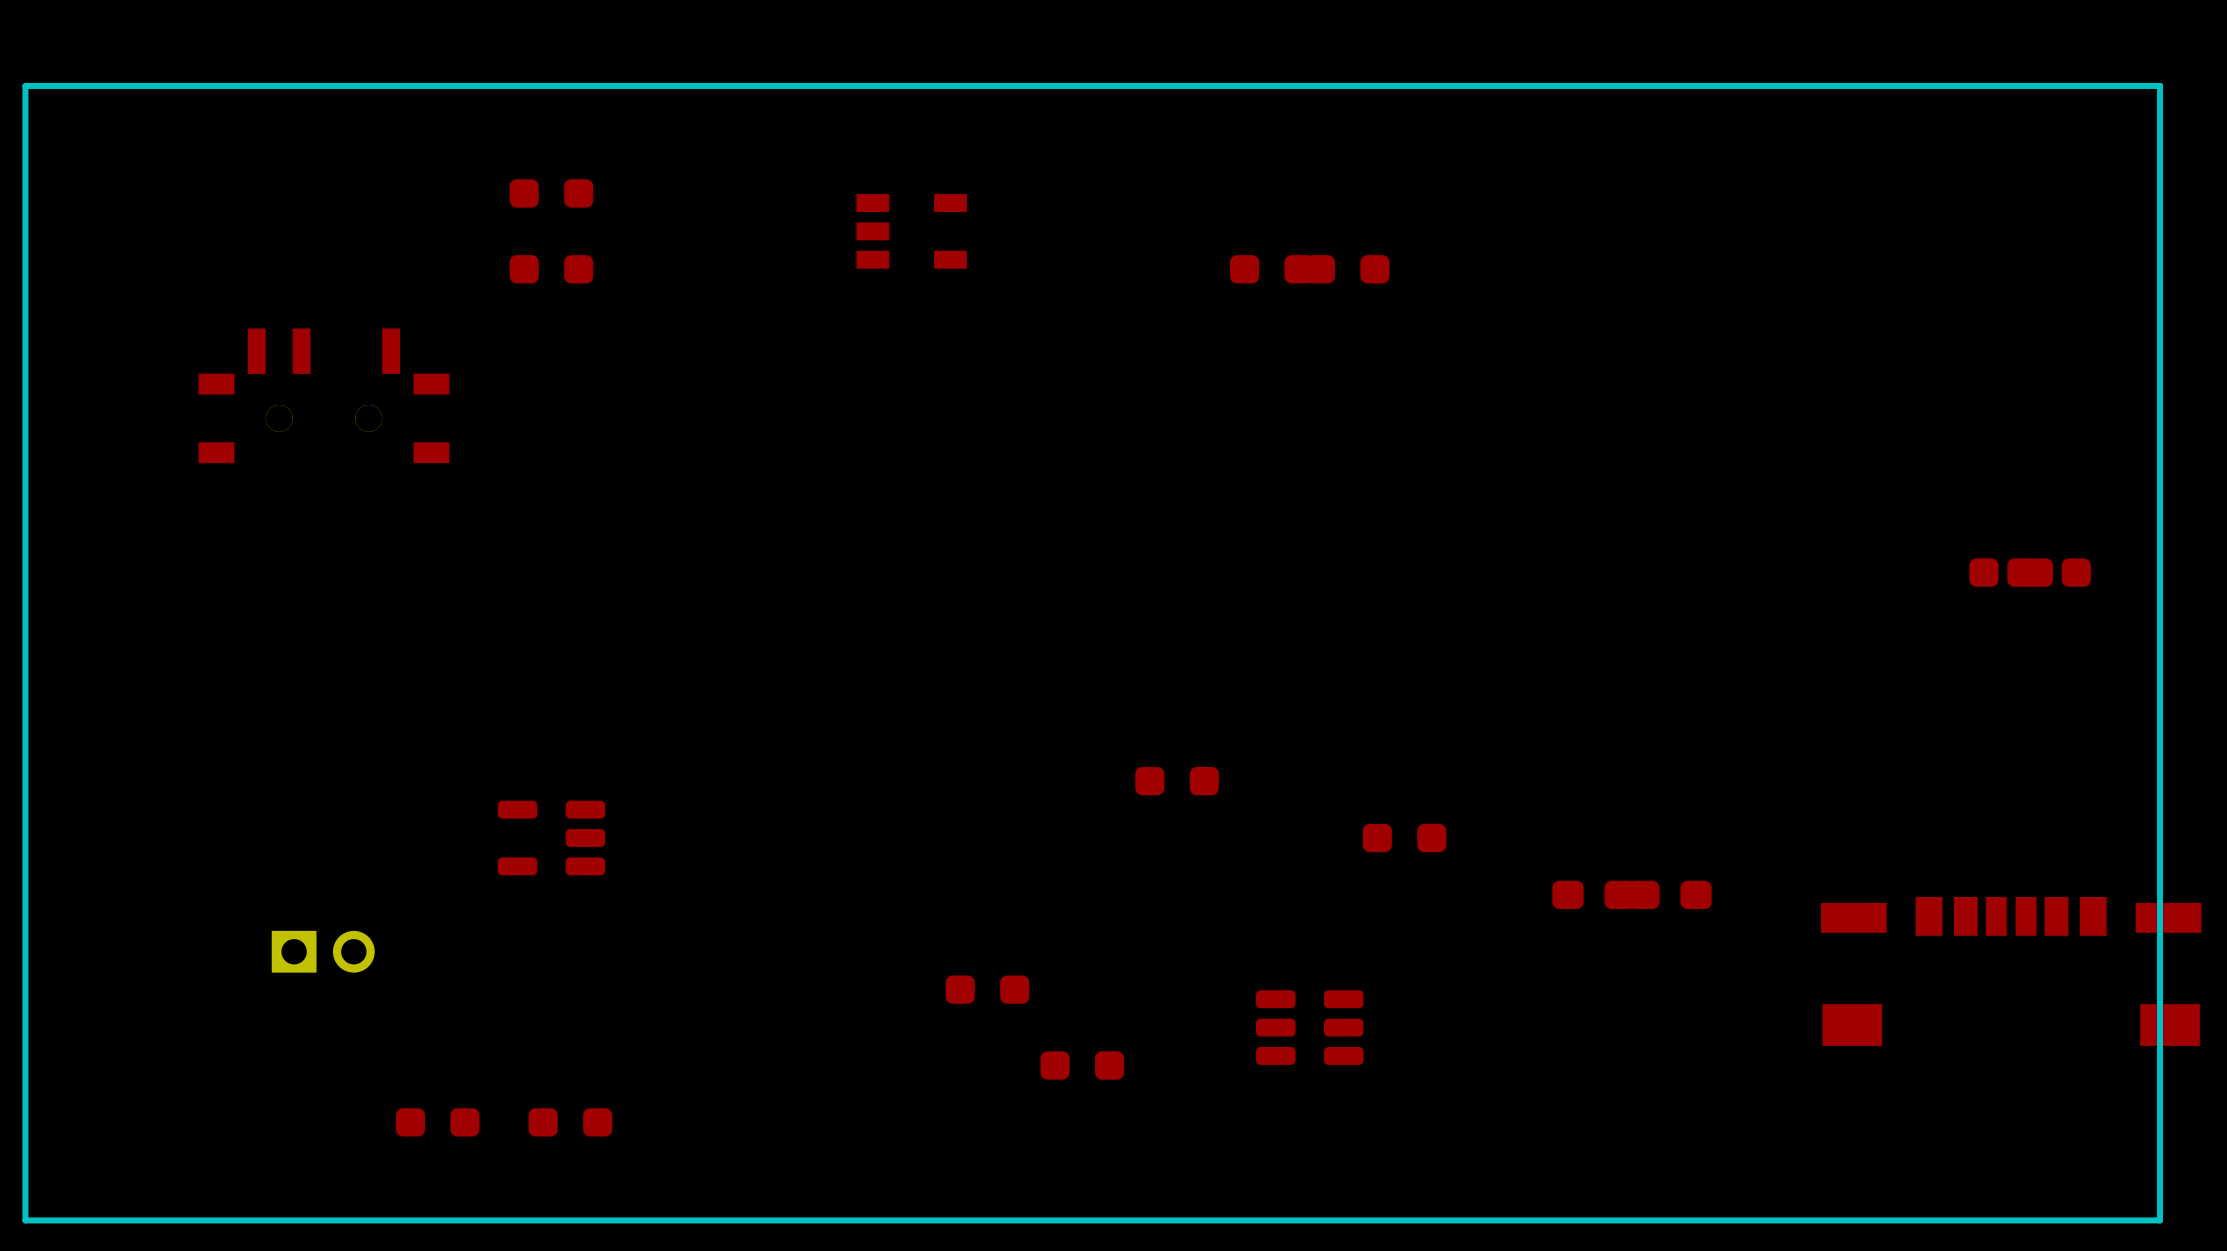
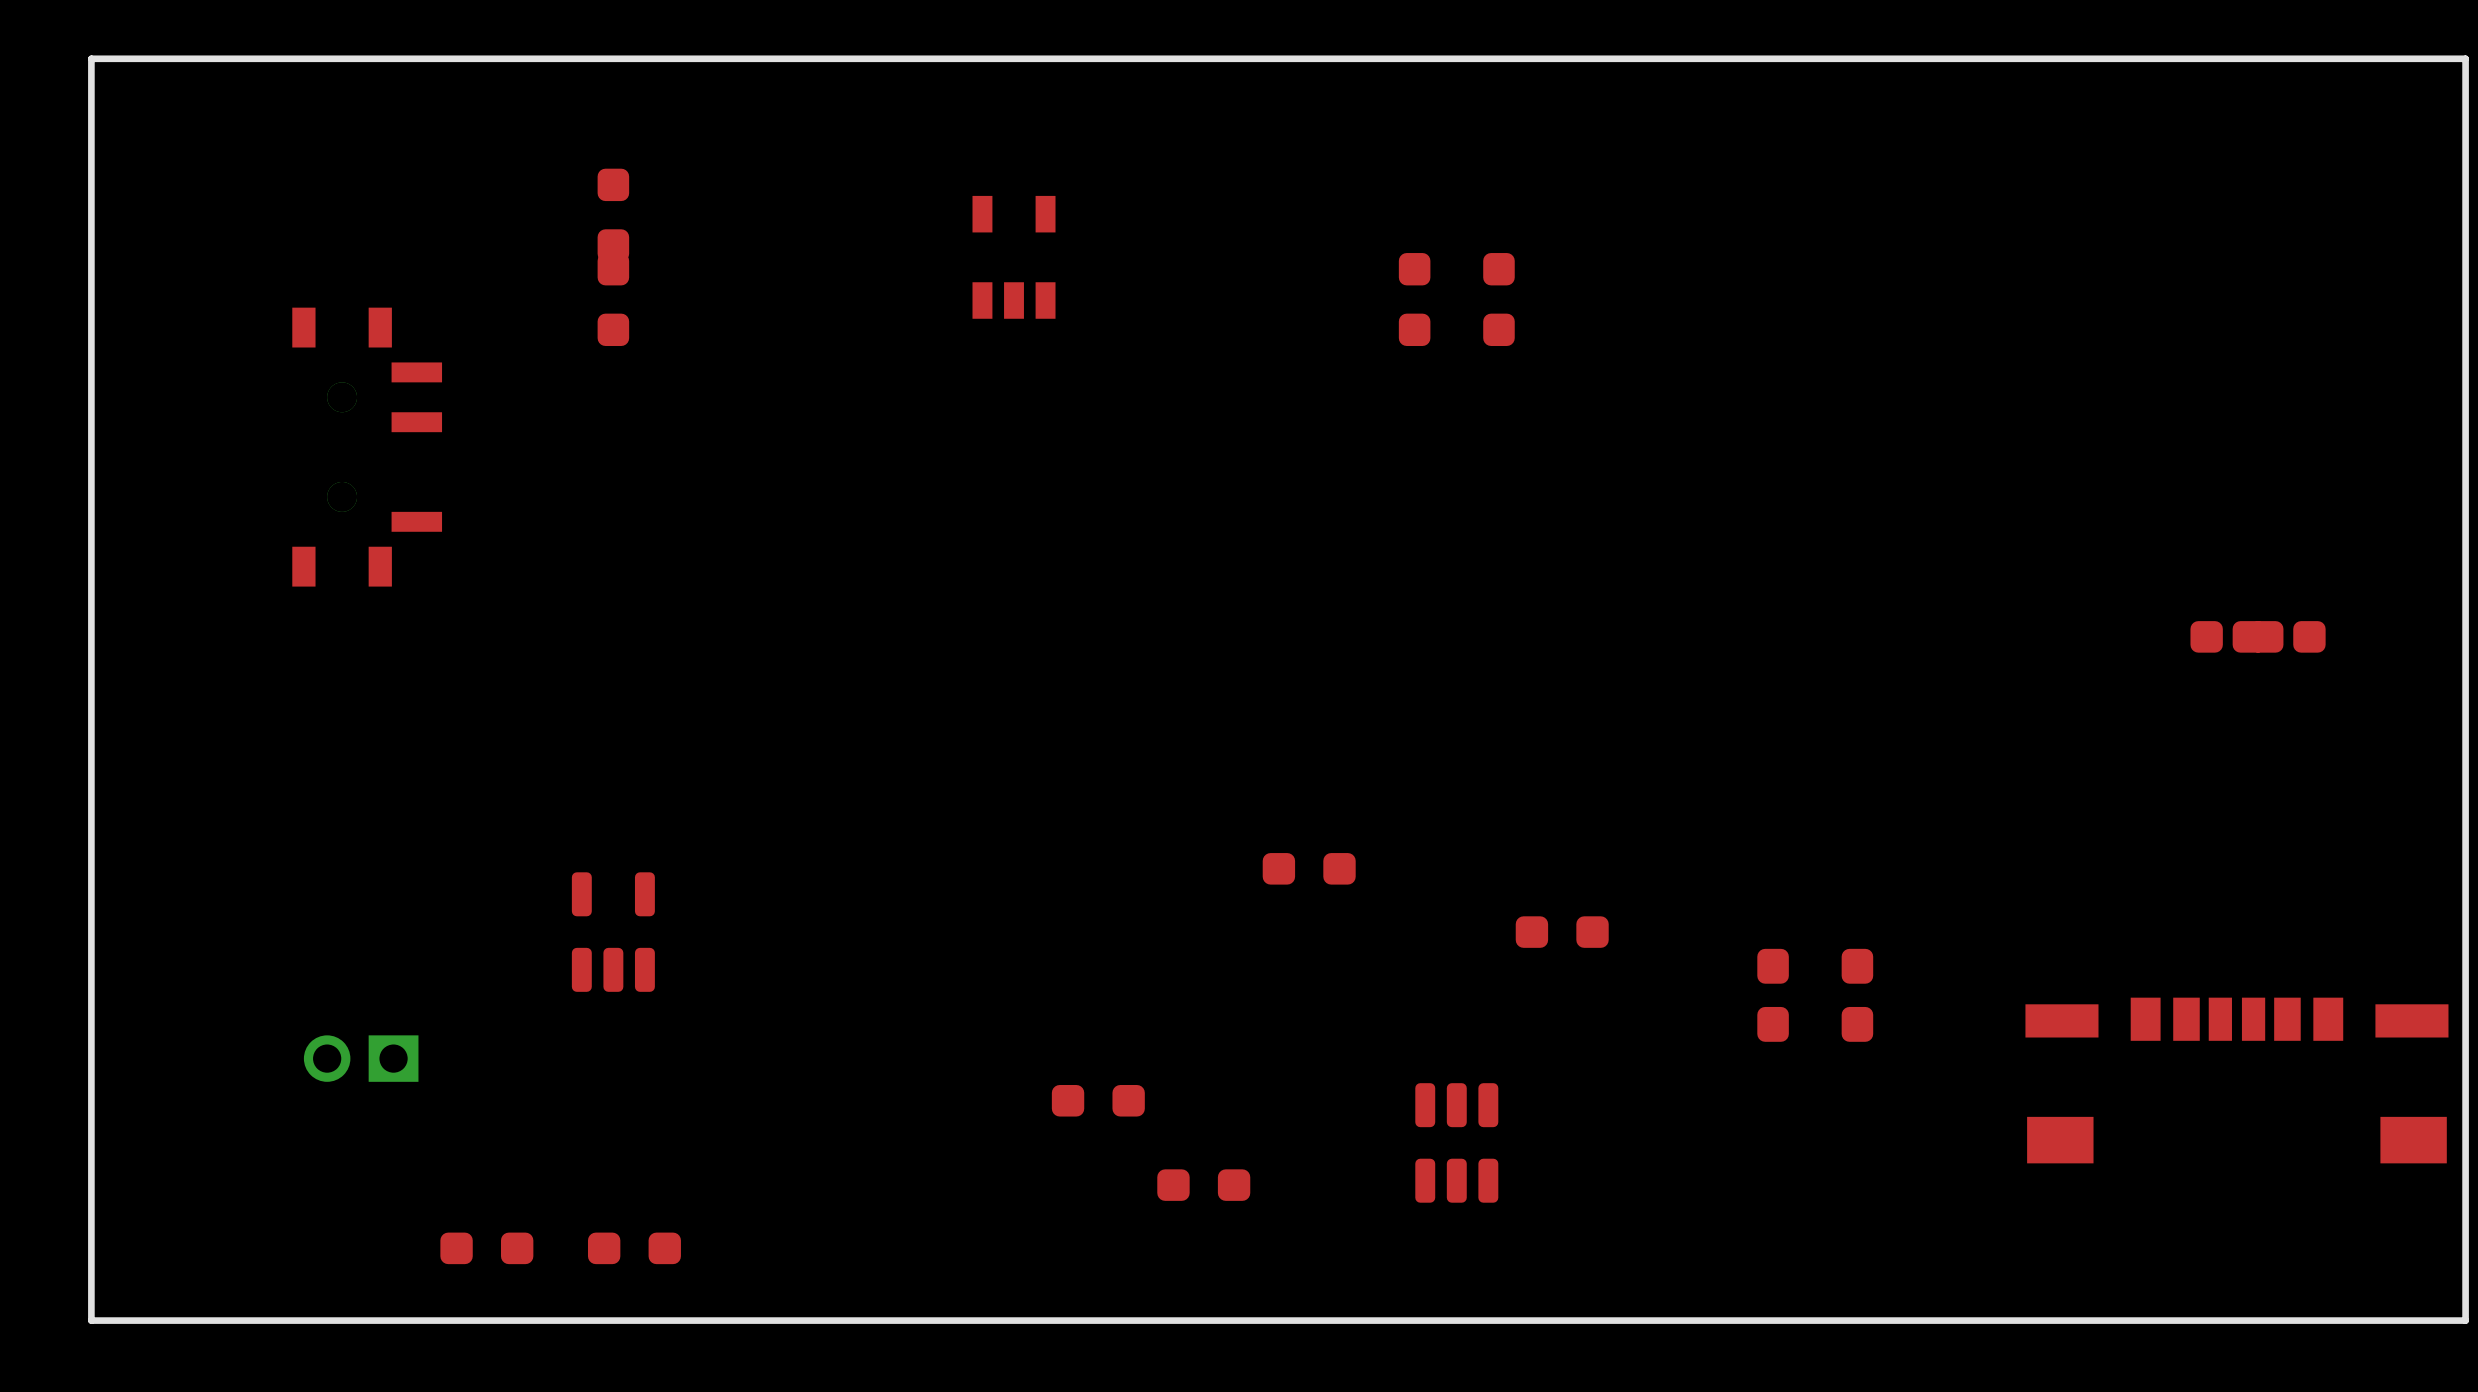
line: (2160, 85) (25, 85) (25, 1220) (2160, 1220) (2160, 85) -> (2465, 58) (91, 58) (91, 1320) (2465, 1320) (2465, 58)
part rotation: 0° (551, 193) -> 90° clockwise (613, 215)
part rotation: 0° (911, 231) -> 90° counterclockwise (1014, 257)
part rotation: 0° (551, 269) -> 90° clockwise (613, 299)
part rotation: 0° (1271, 269) -> 90° clockwise (1414, 299)
part rotation: 0° (1347, 269) -> 90° clockwise (1498, 299)
part rotation: 0° (323, 395) -> 90° clockwise (367, 447)
part rotation: 0° (551, 838) -> 90° clockwise (613, 932)
part rotation: 0° (1594, 894) -> 90° clockwise (1773, 995)
part rotation: 0° (1669, 894) -> 90° clockwise (1857, 995)
part rotation: 0° (323, 951) -> 180° (361, 1058)
part rotation: 0° (1309, 1027) -> 90° clockwise (1456, 1142)

